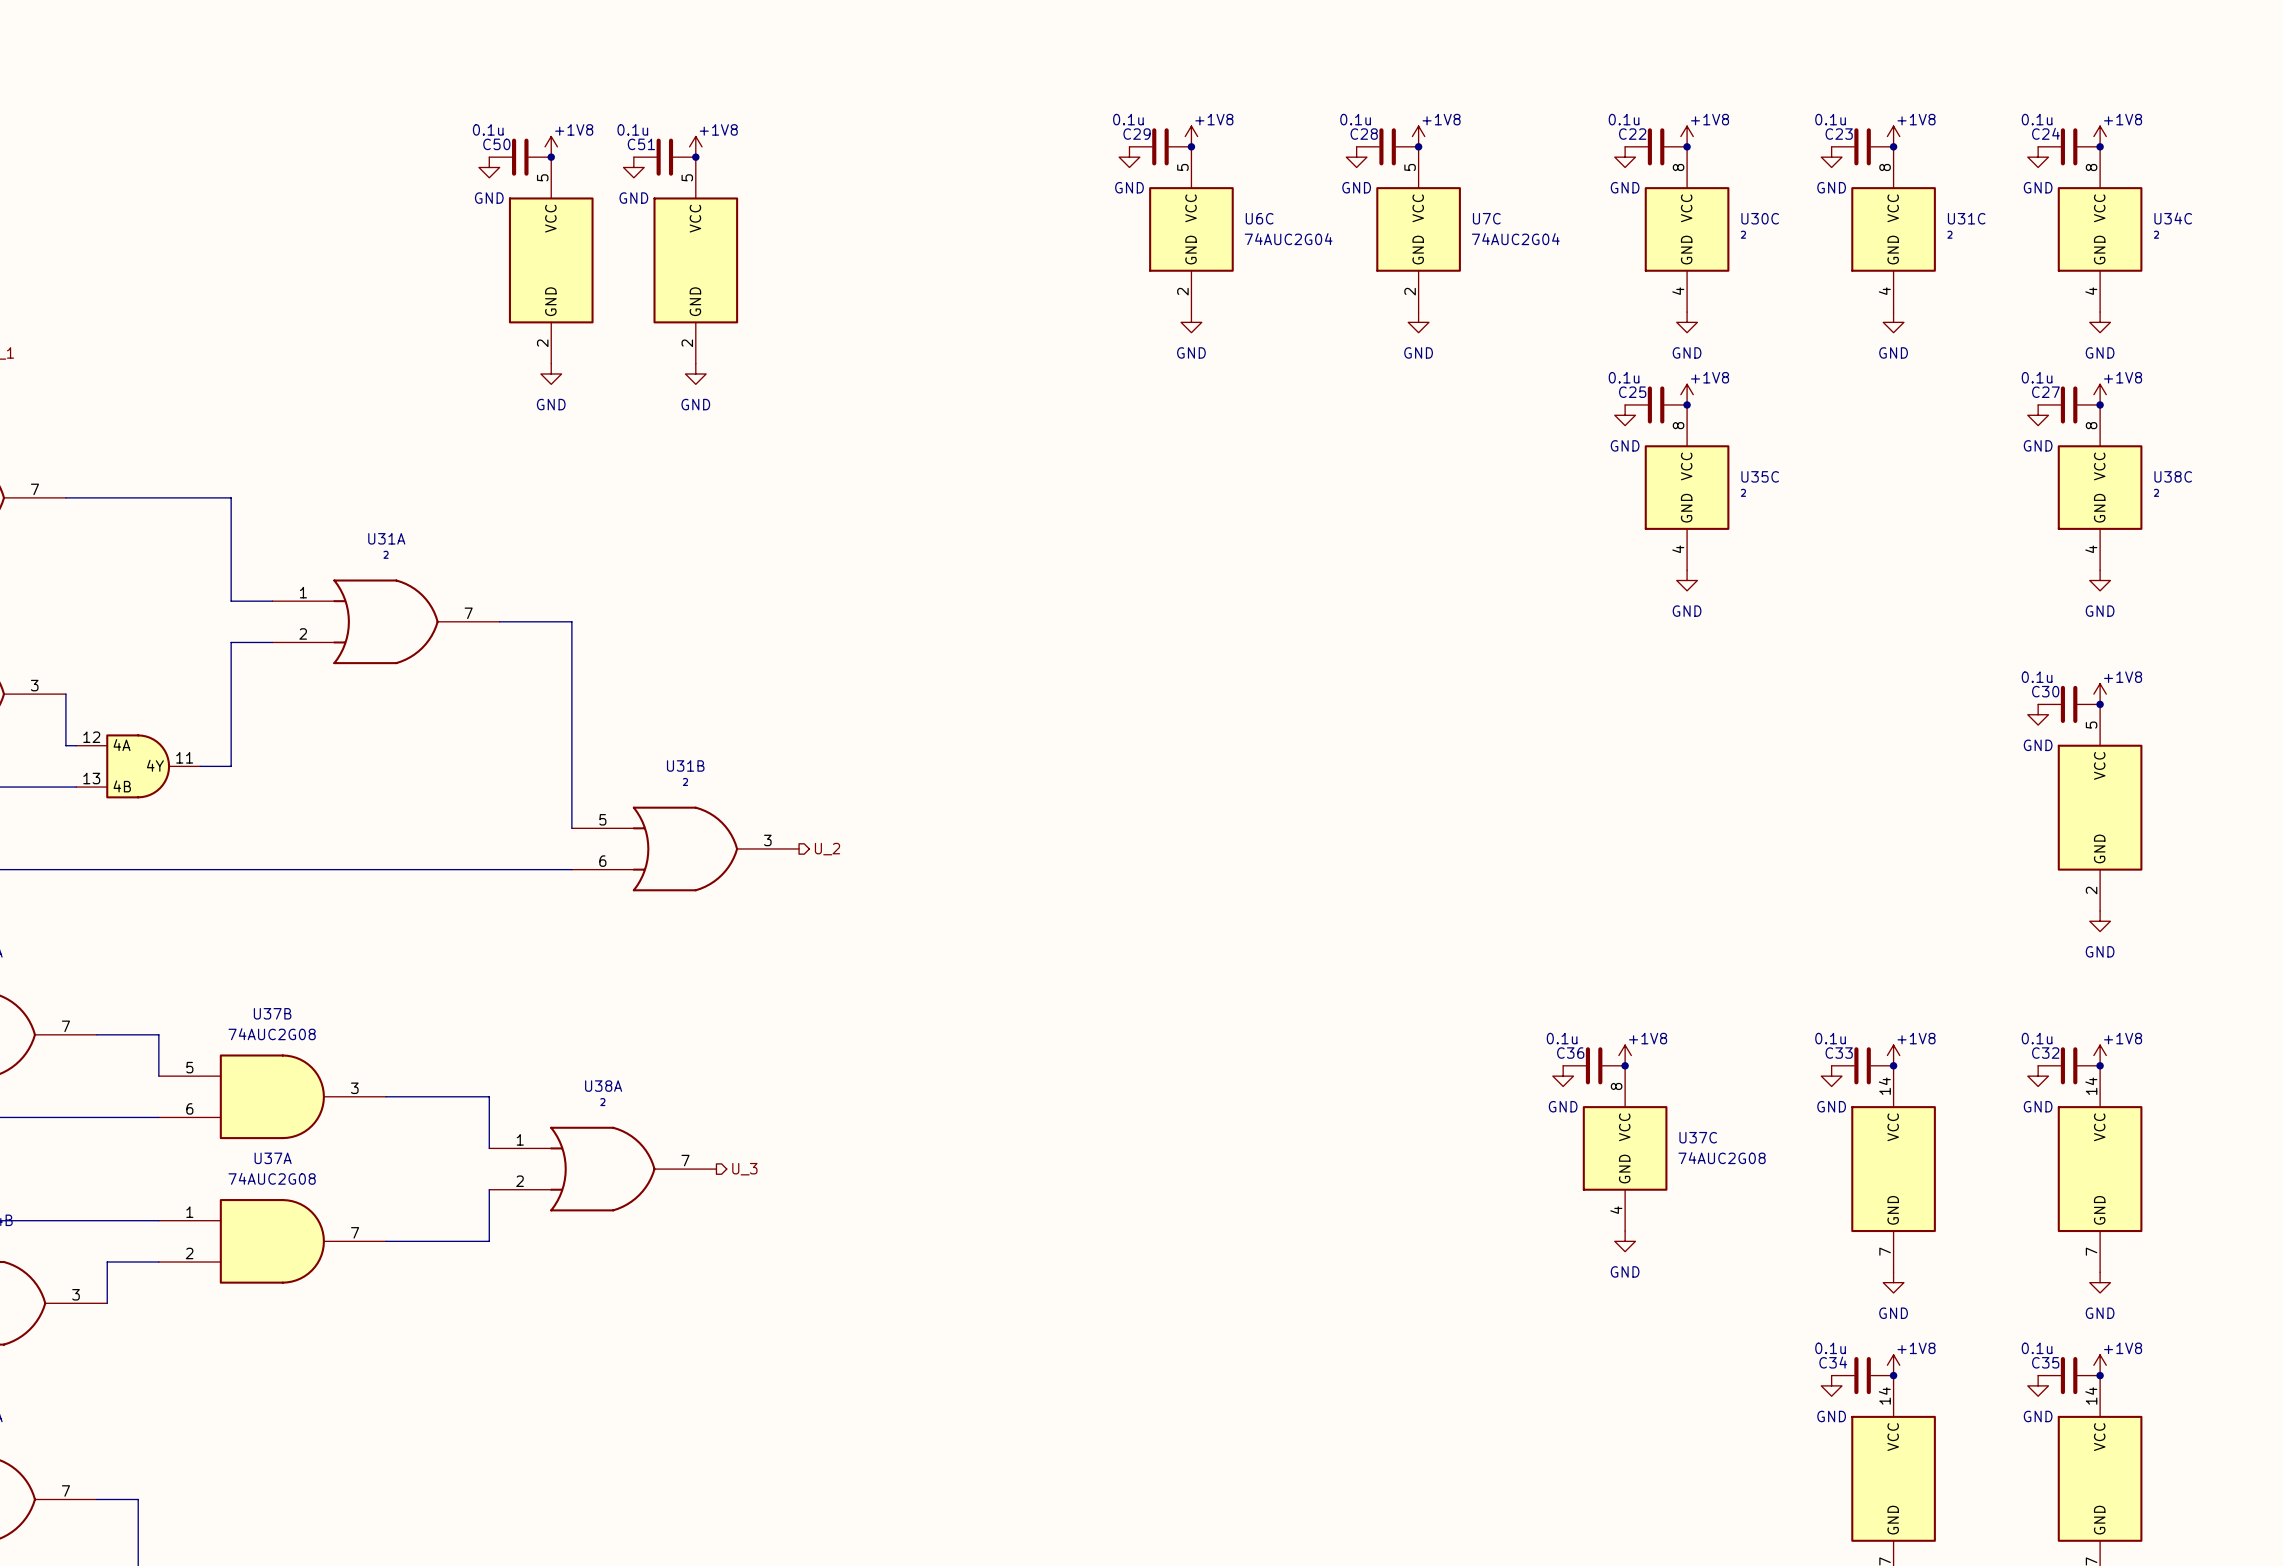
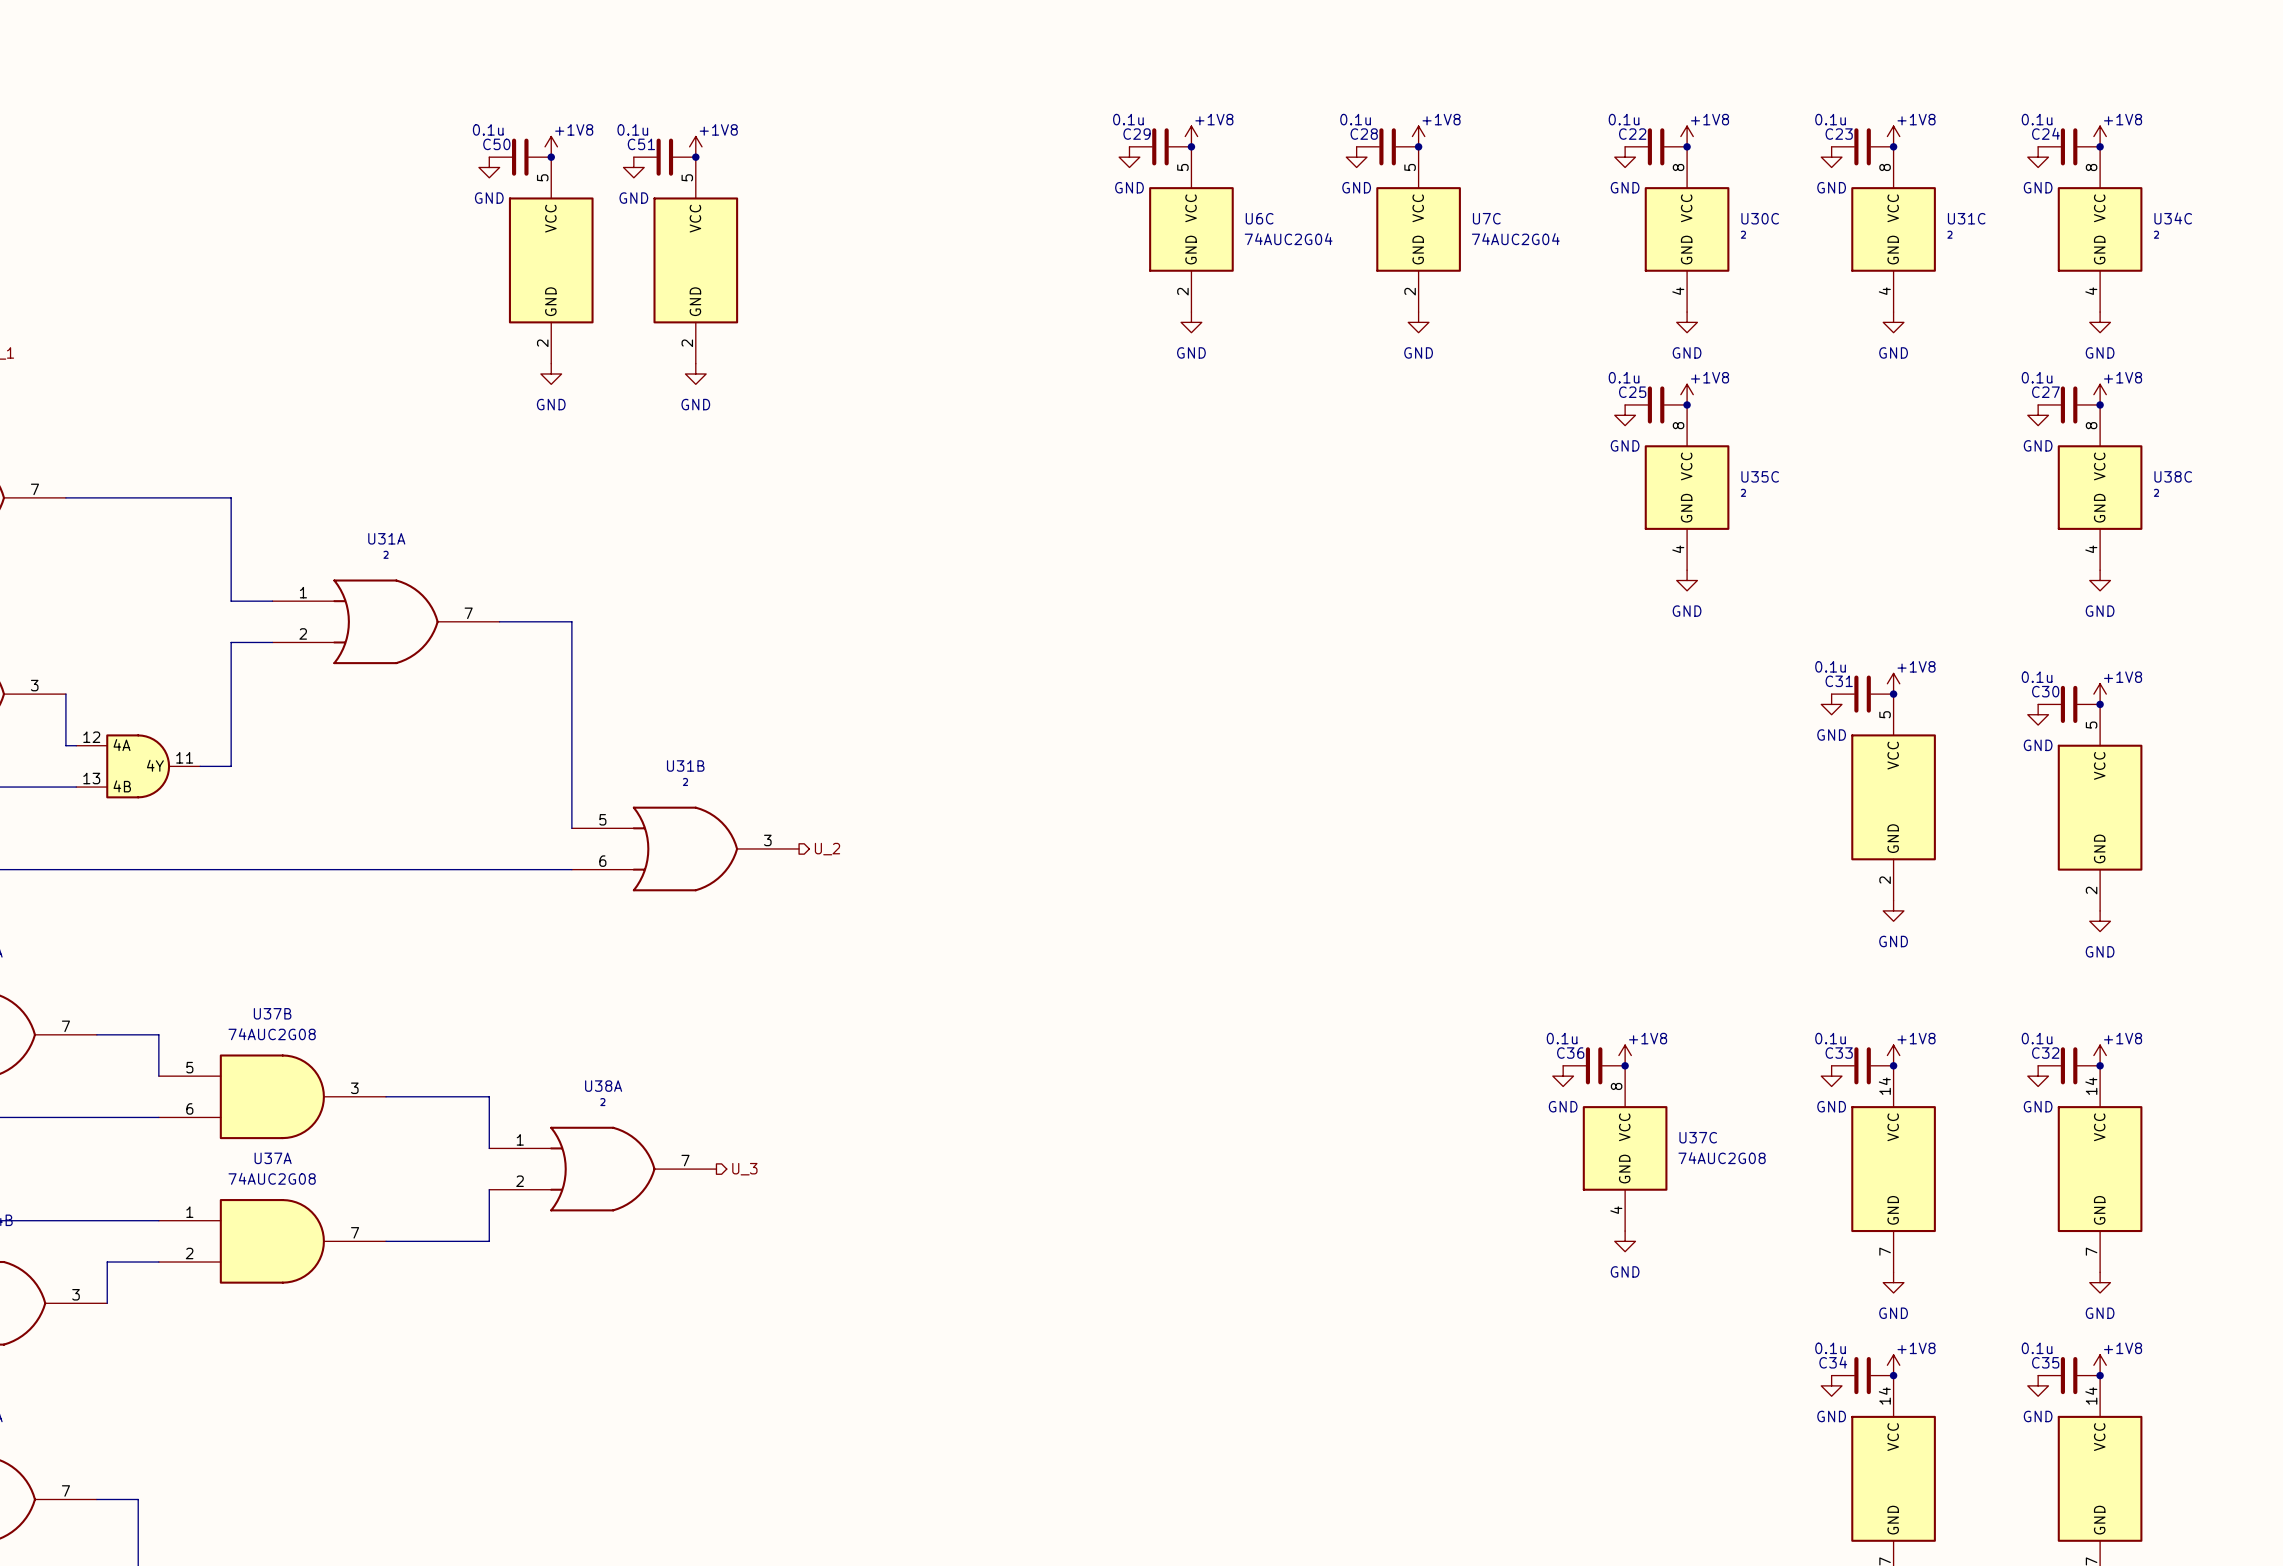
power symbol: none -> +1V8 (1893, 683)
C31: none -> 0.1u (1862, 694)
junction: none -> (1893, 694)
power symbol: none -> GND (1831, 704)
part: none -> (1893, 797)
power symbol: none -> GND (1893, 910)

